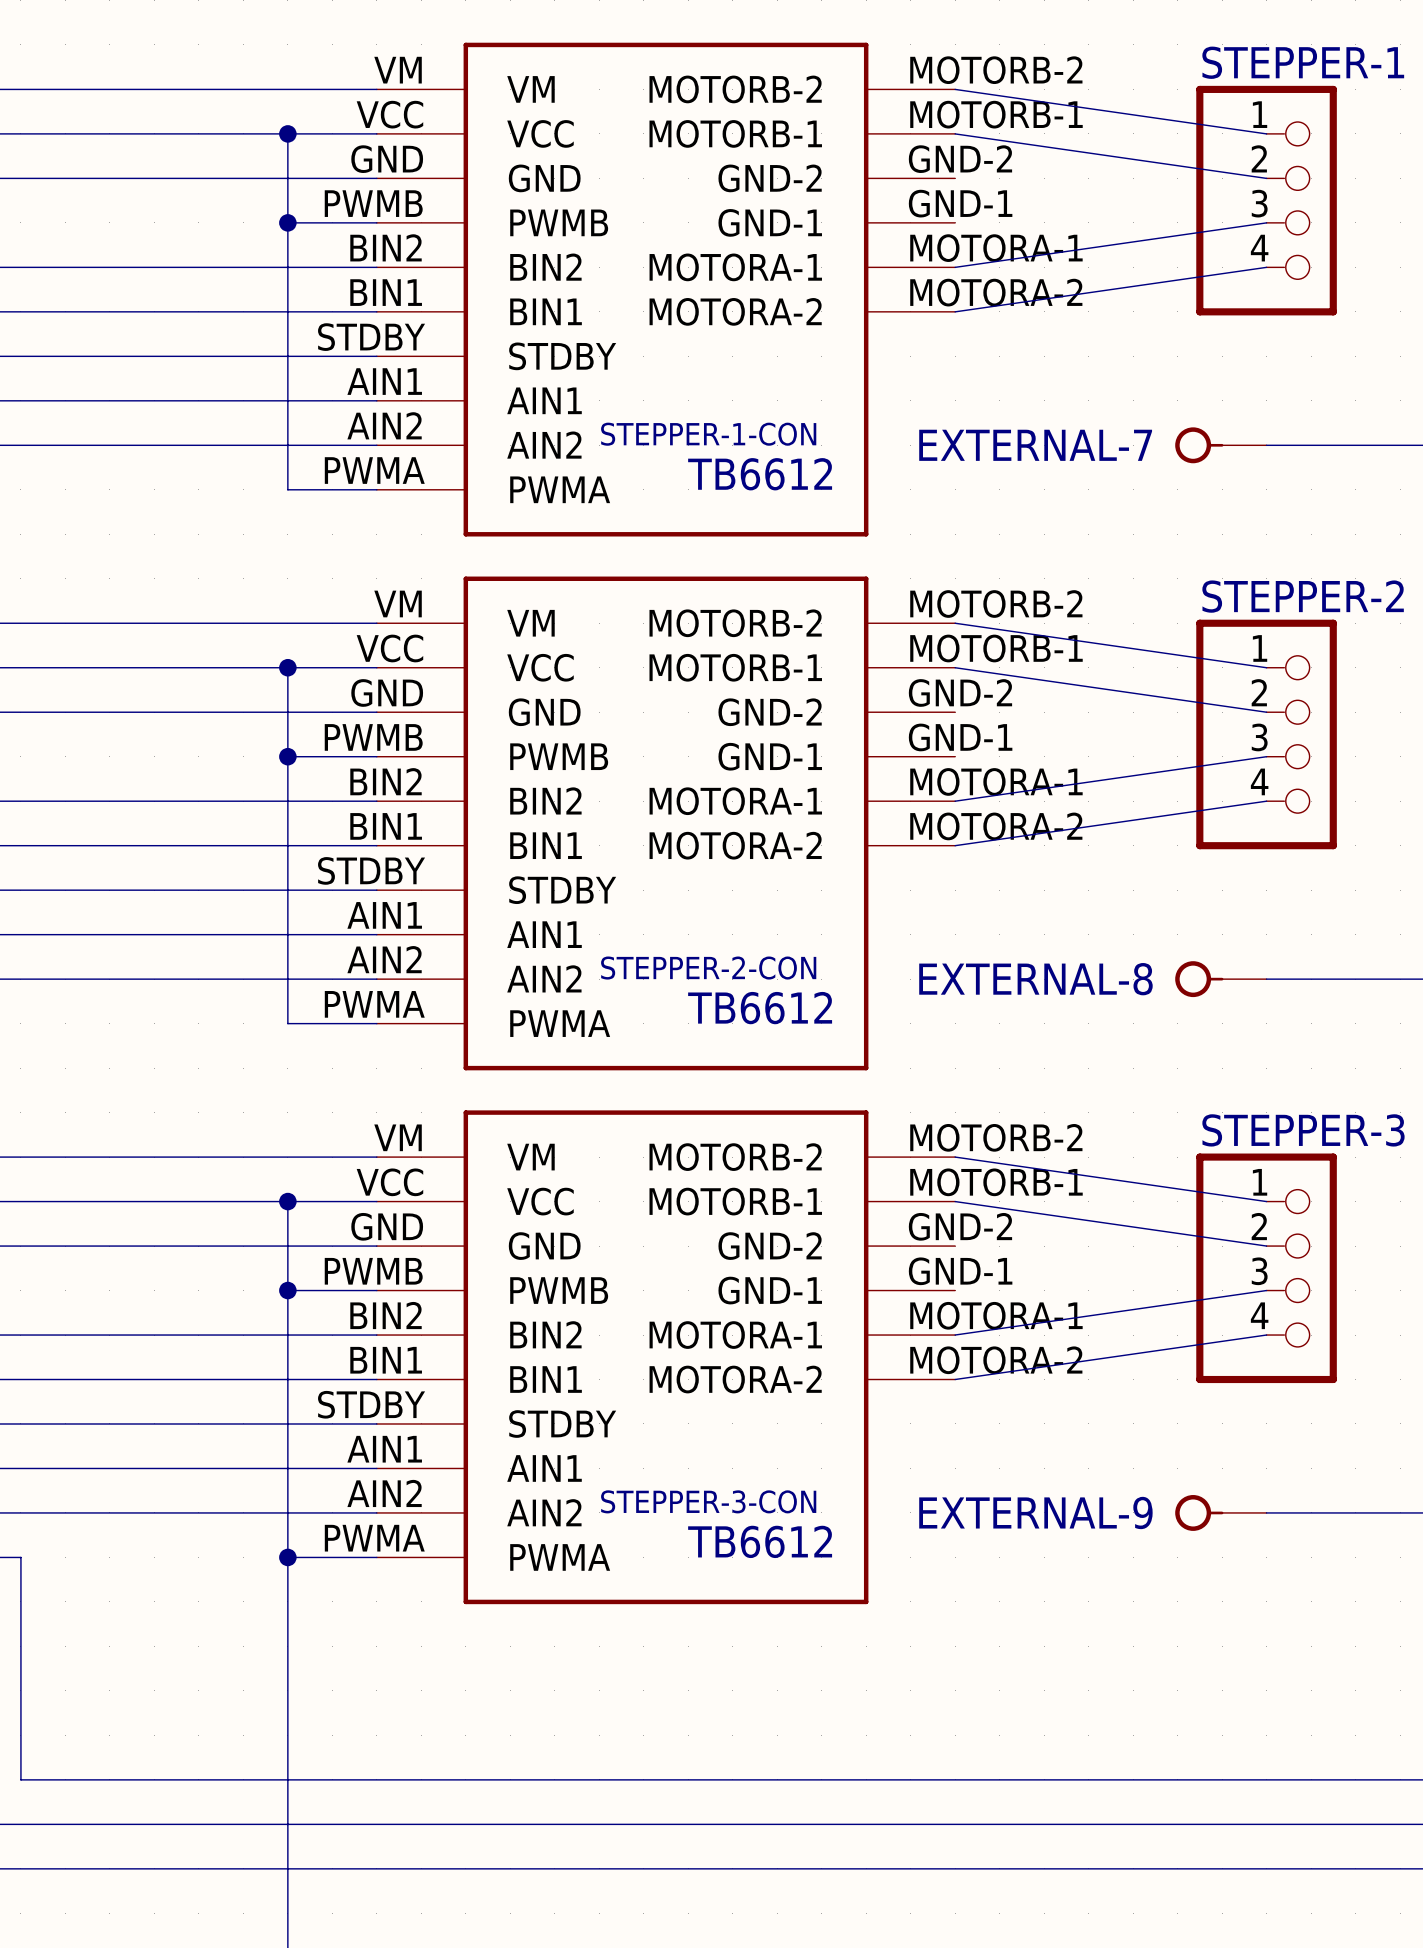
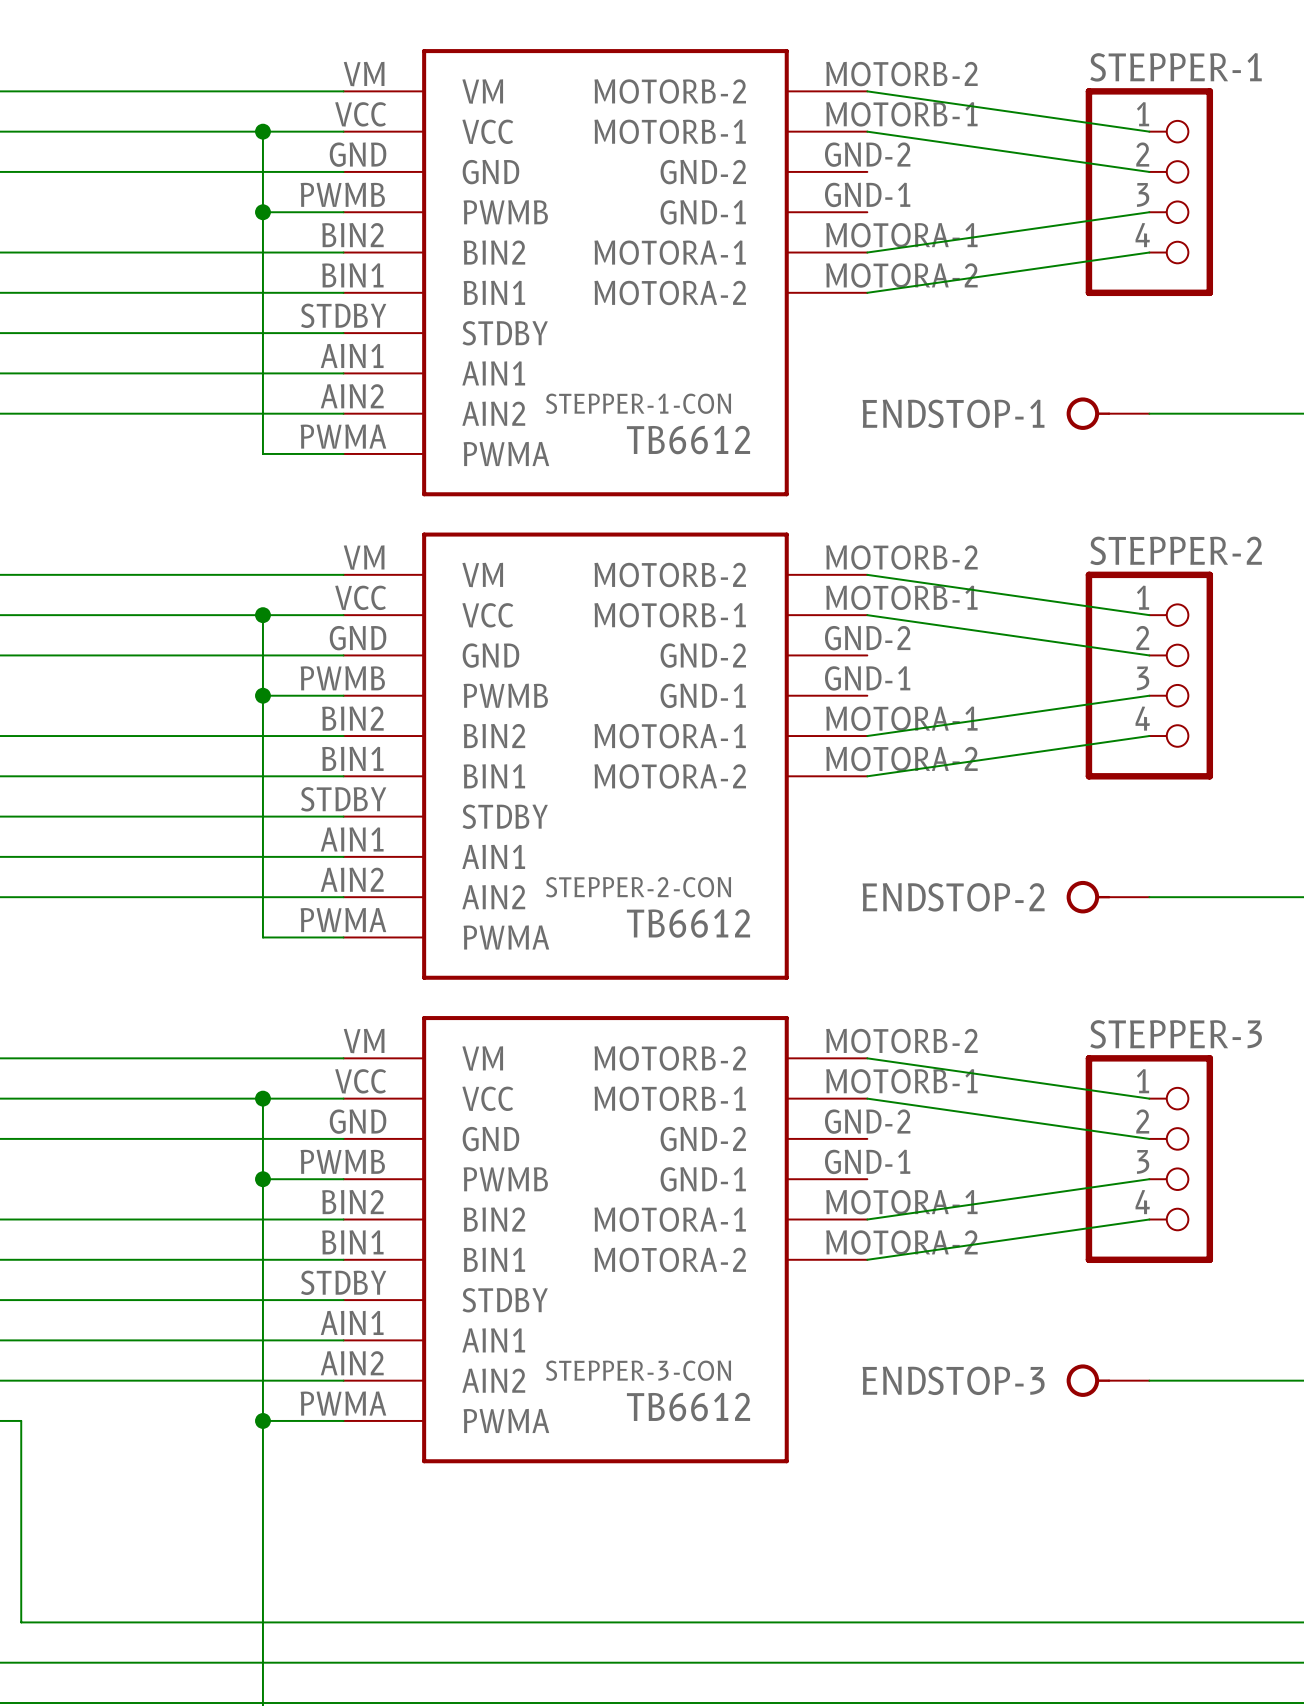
EXTERNAL-7 name: EXTERNAL-7 (1035, 445) -> ENDSTOP-1 (953, 413)
EXTERNAL-8 name: EXTERNAL-8 (1035, 979) -> ENDSTOP-2 (953, 897)
EXTERNAL-9 name: EXTERNAL-9 (1035, 1512) -> ENDSTOP-3 (953, 1380)

